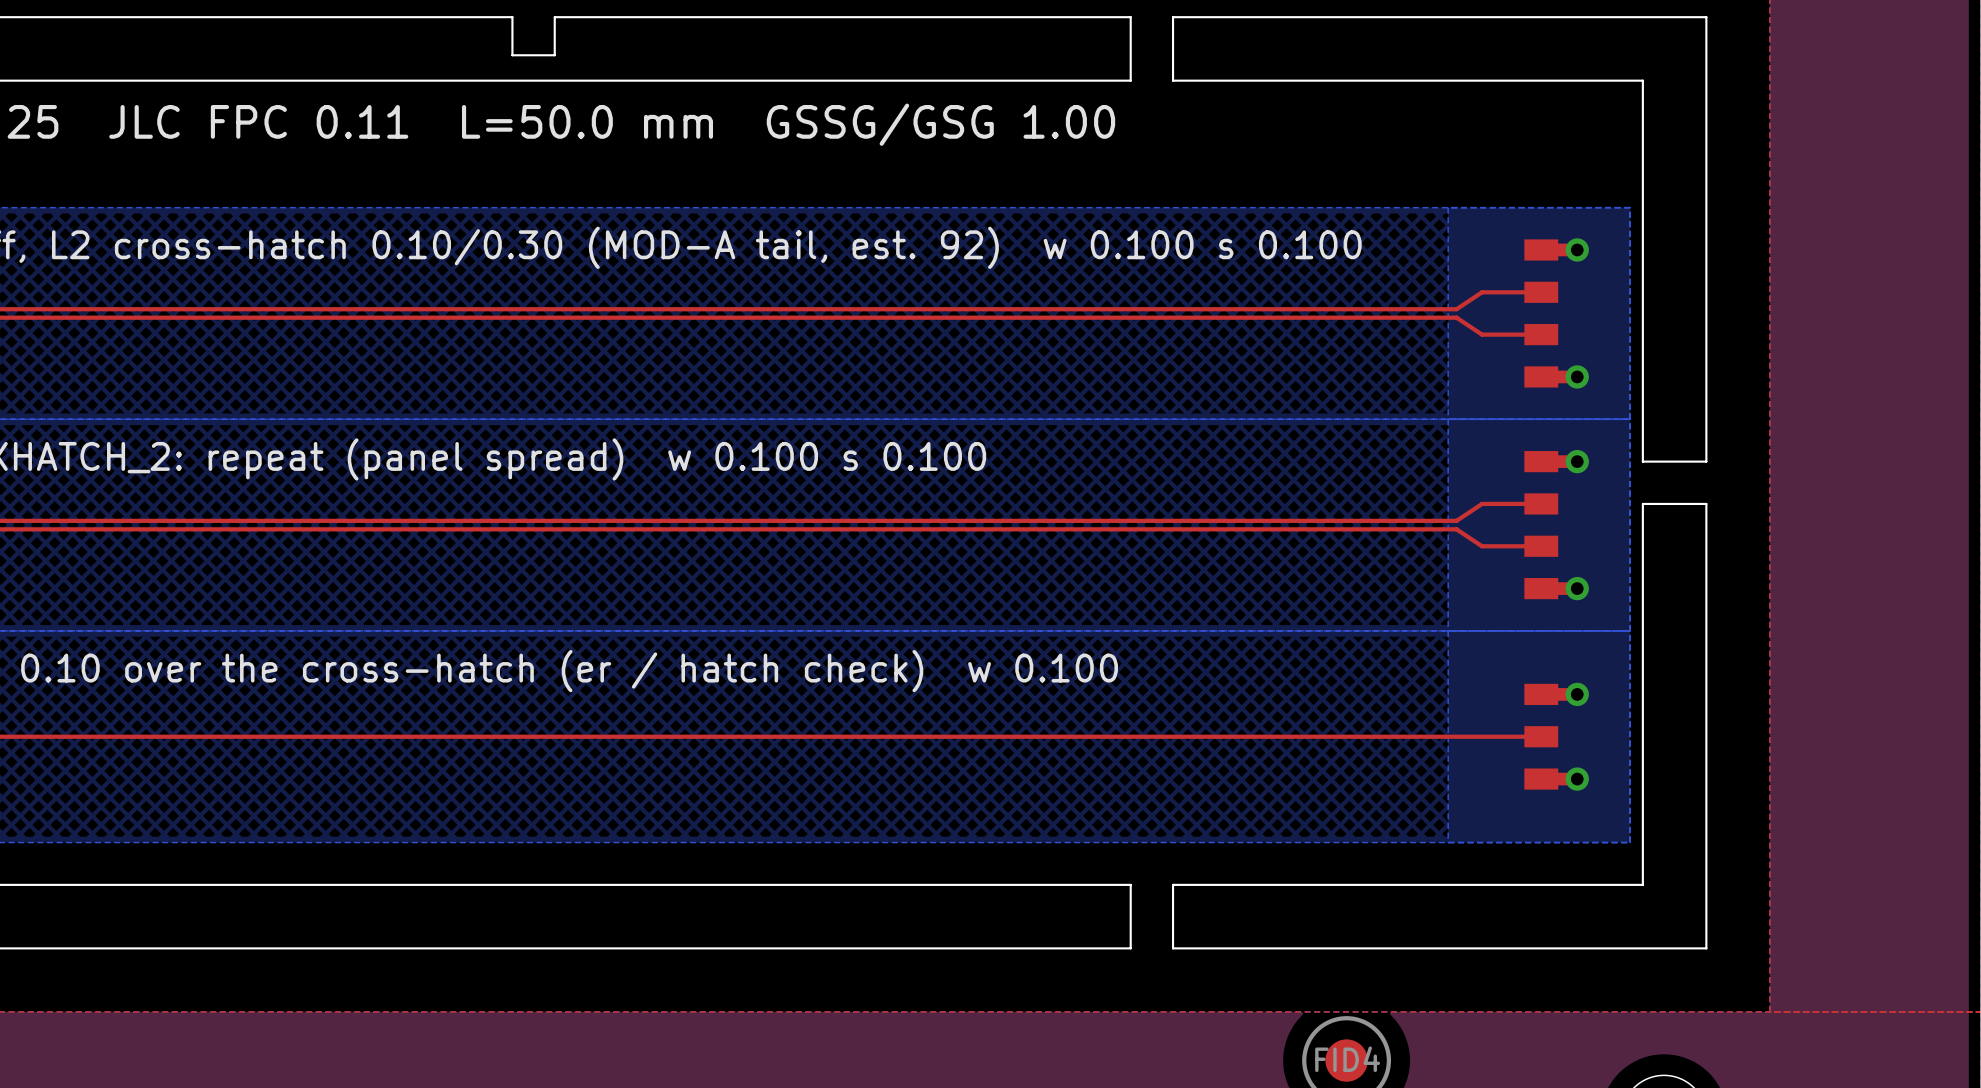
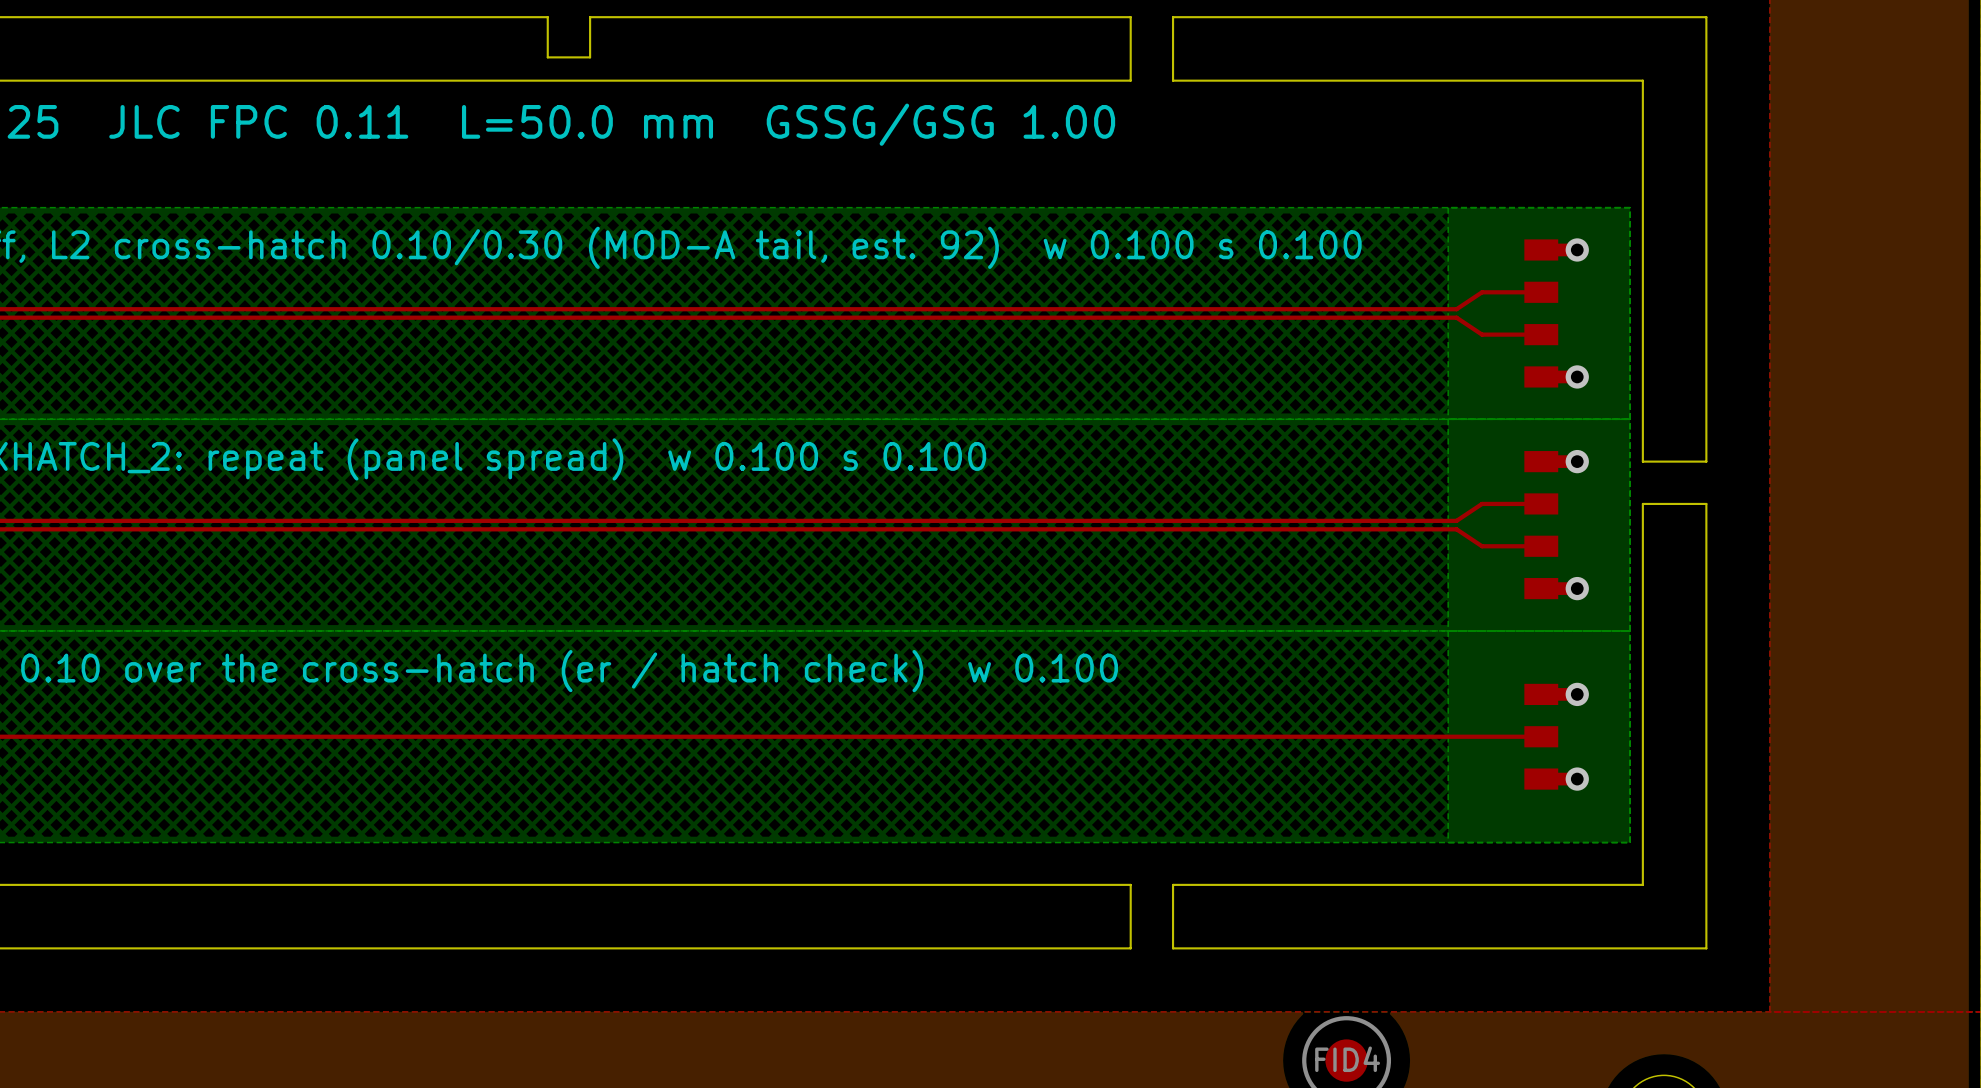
board edge: (512, 17) (512, 55) (554, 55) (554, 17) (590, 17) -> (512, 17) (547, 17) (547, 57) (590, 57) (590, 17)

